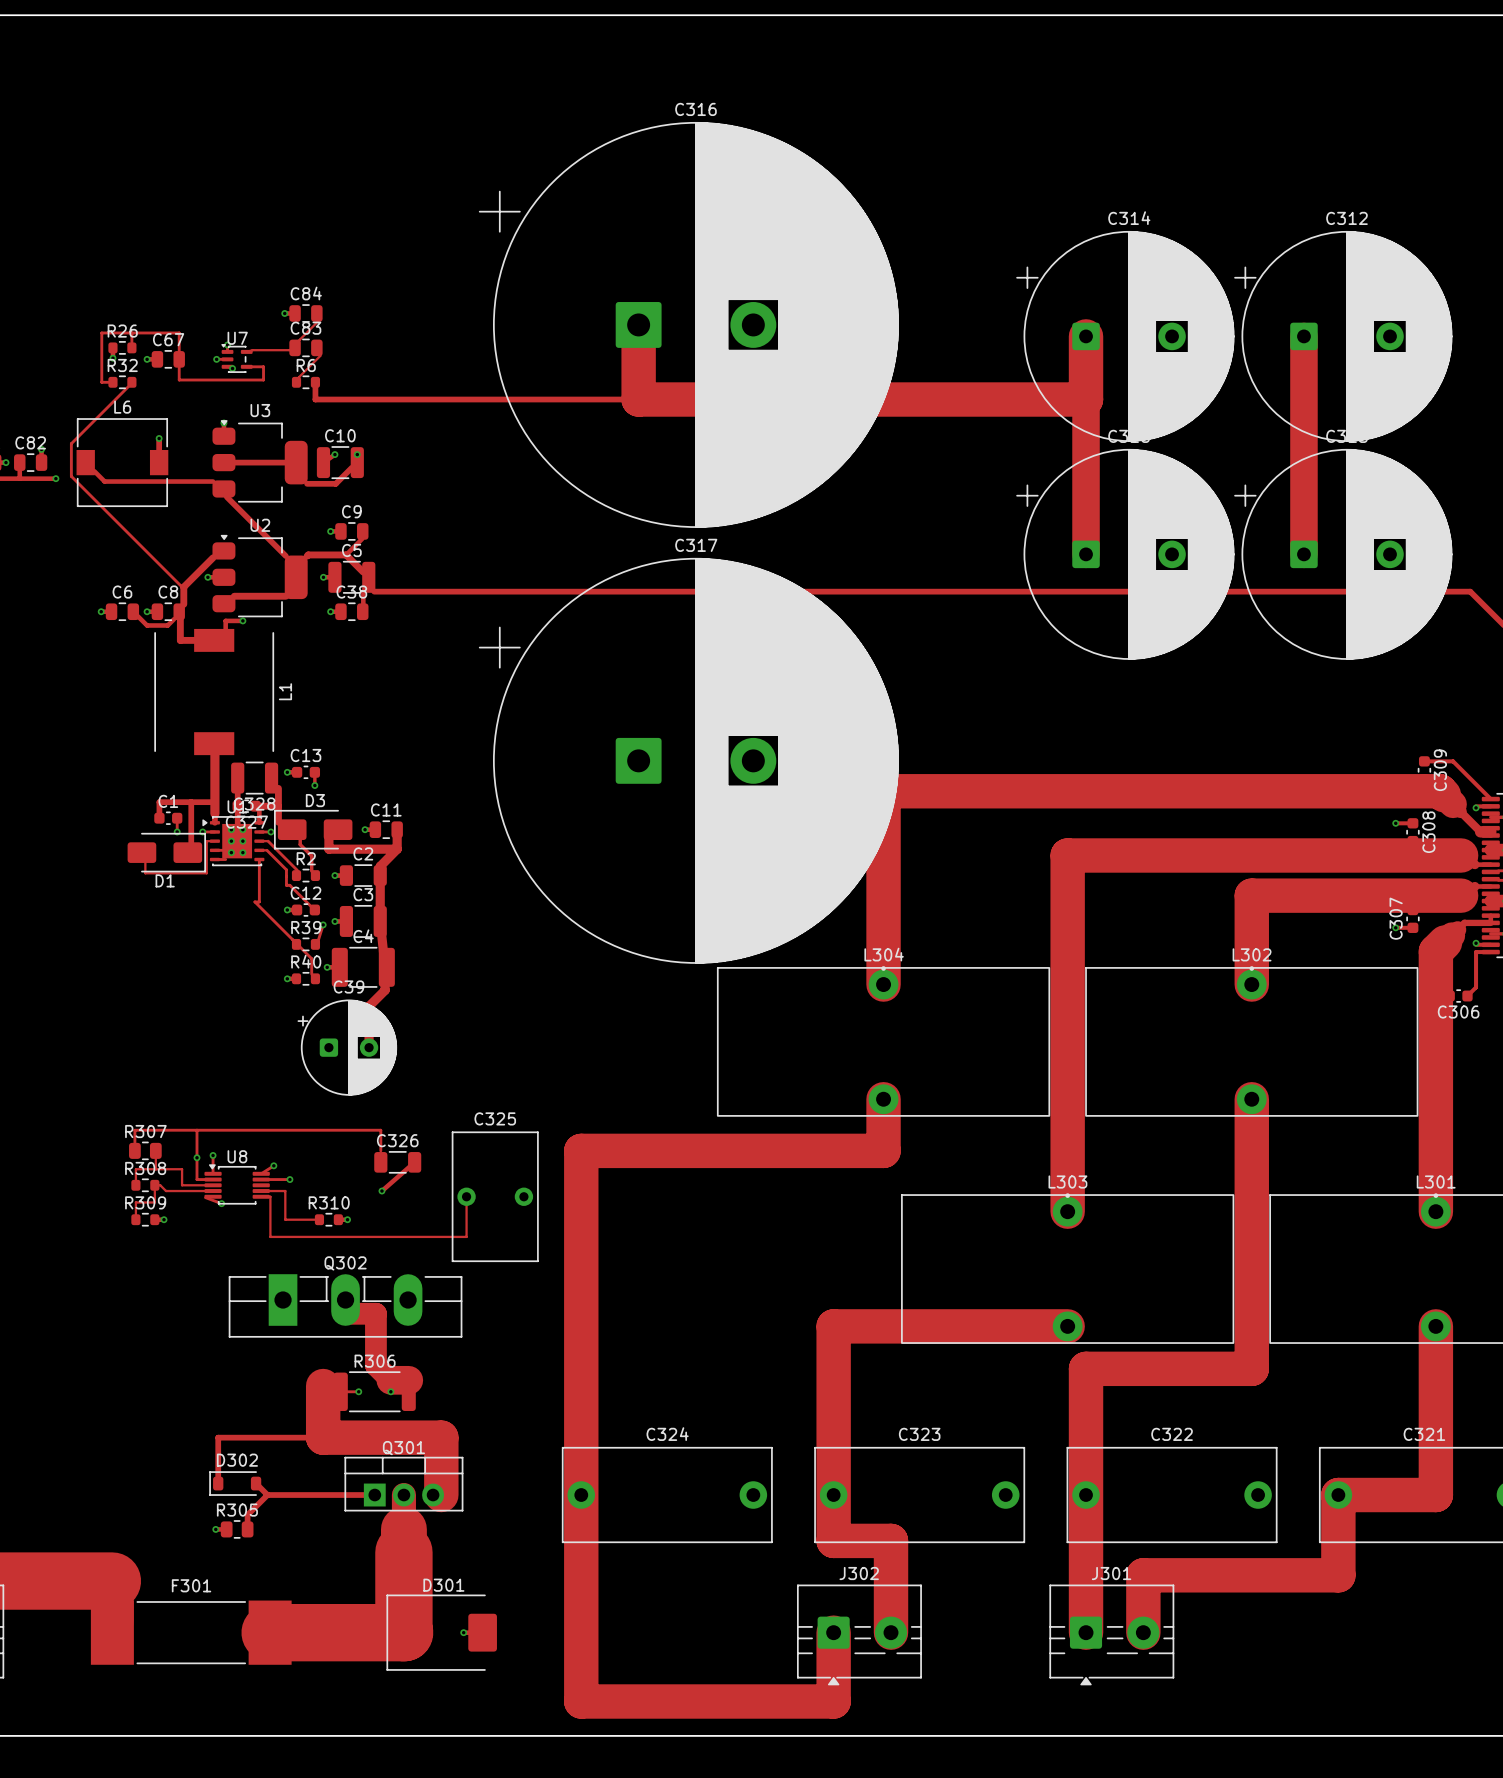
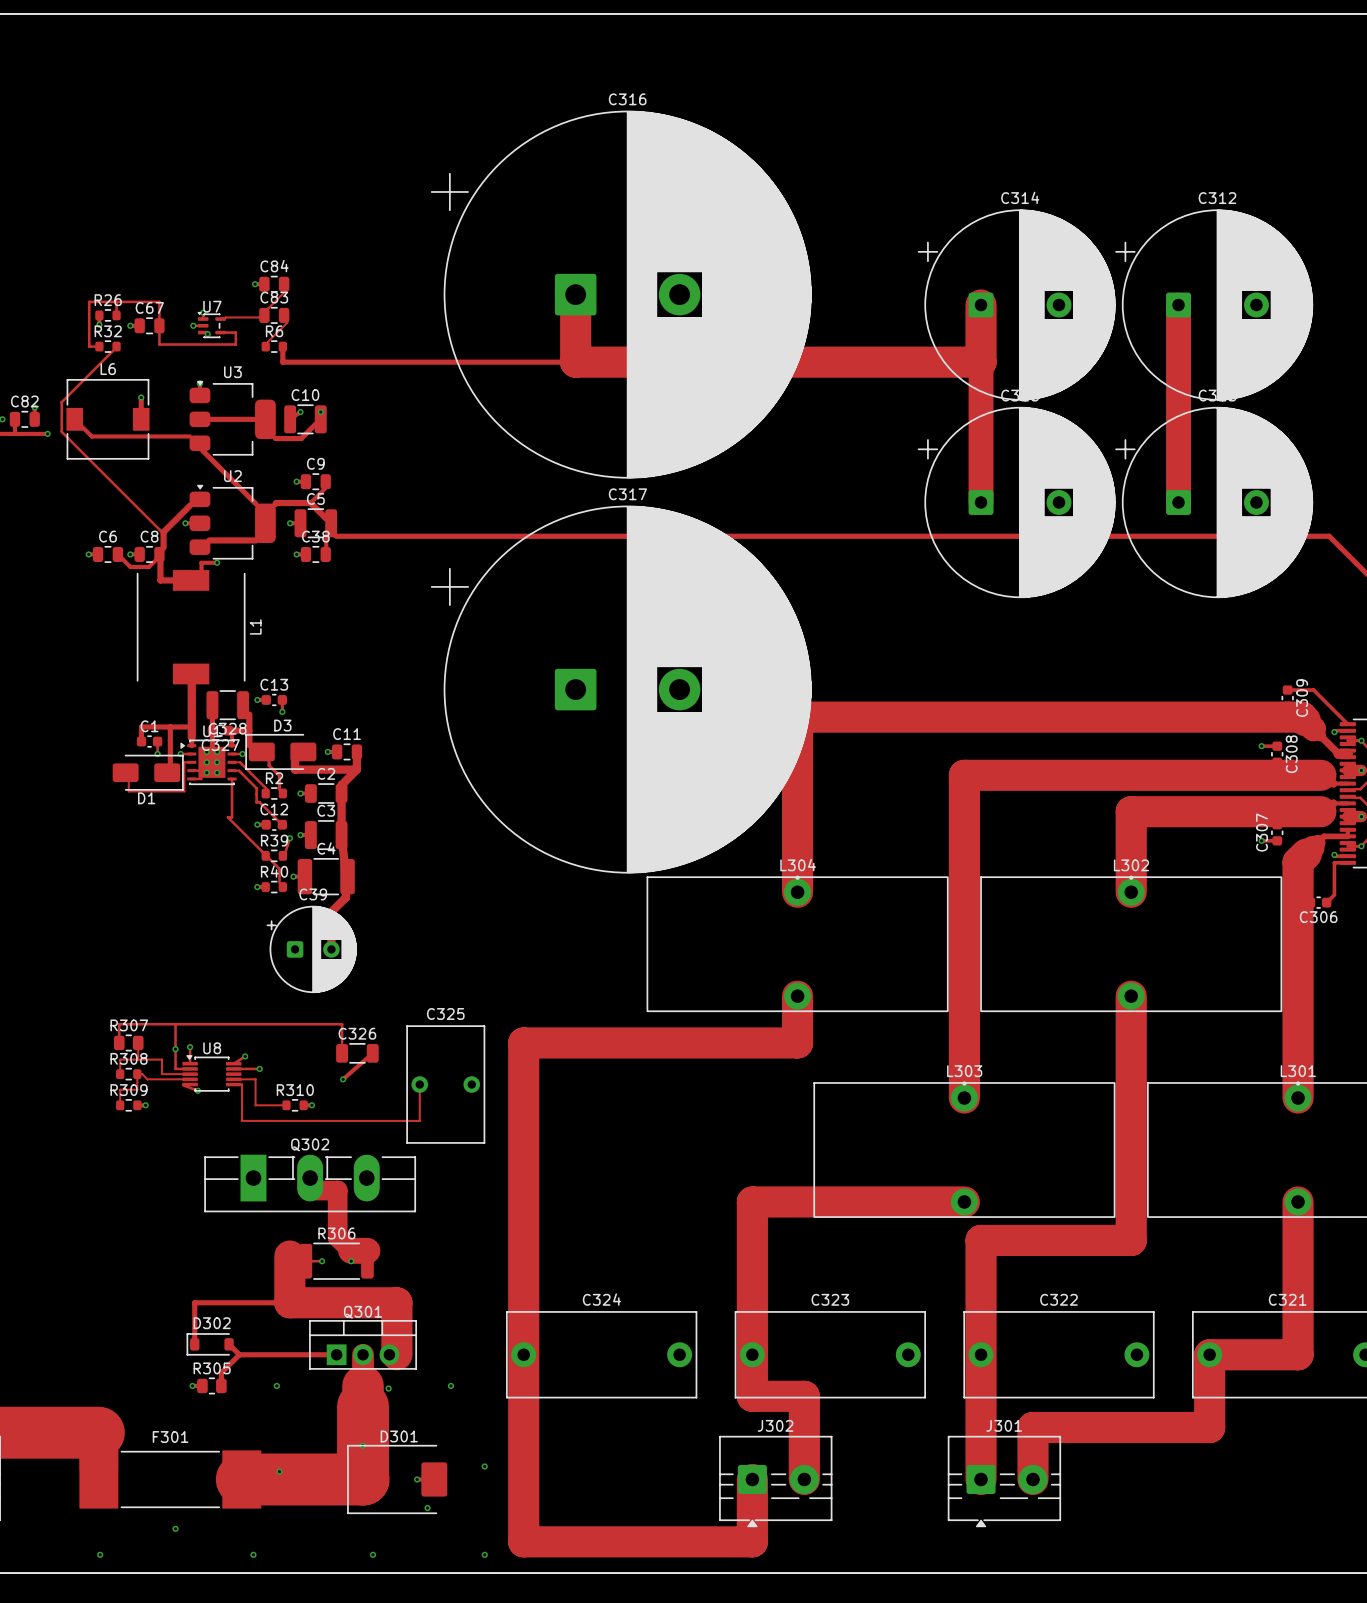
via: none -> (276, 1385)
via: none -> (450, 1385)
via: none -> (388, 1388)
via: none -> (362, 1445)
via: none -> (484, 1466)
via: none -> (279, 1471)
via: none -> (427, 1508)
via: none -> (175, 1528)
via: none -> (100, 1554)
via: none -> (253, 1554)
via: none -> (373, 1554)
via: none -> (484, 1554)

